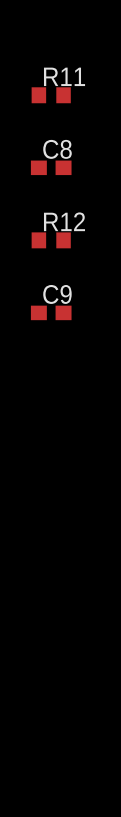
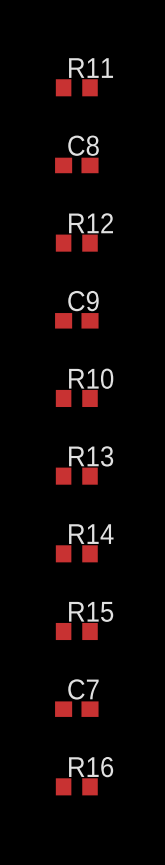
R10: none -> (76, 398)
R13: none -> (76, 476)
R14: none -> (76, 553)
R15: none -> (76, 631)
C7: none -> (76, 709)
R16: none -> (76, 786)

